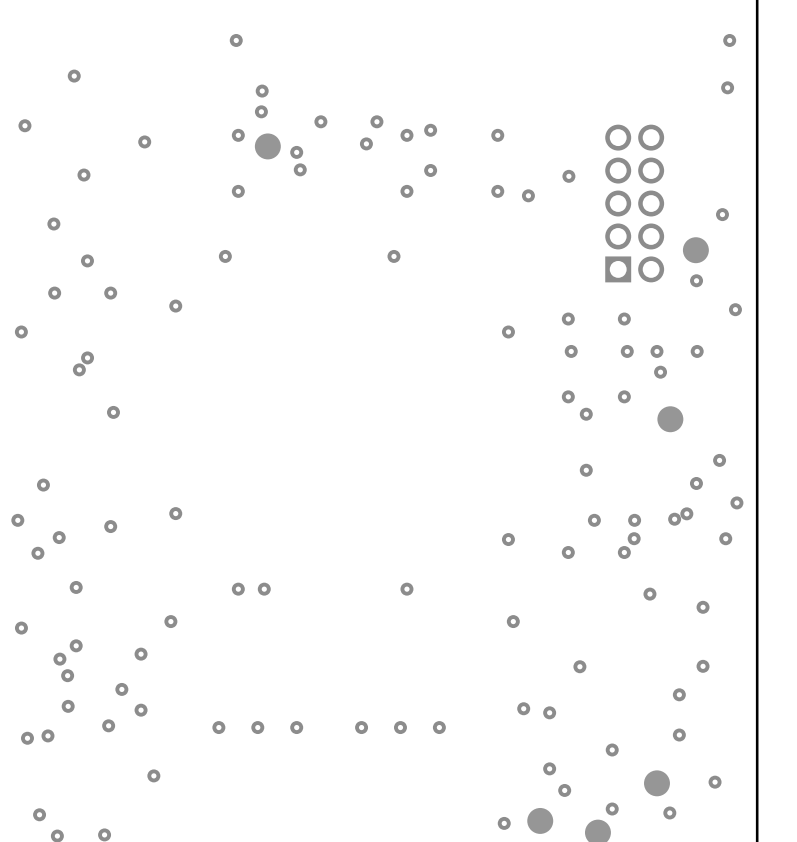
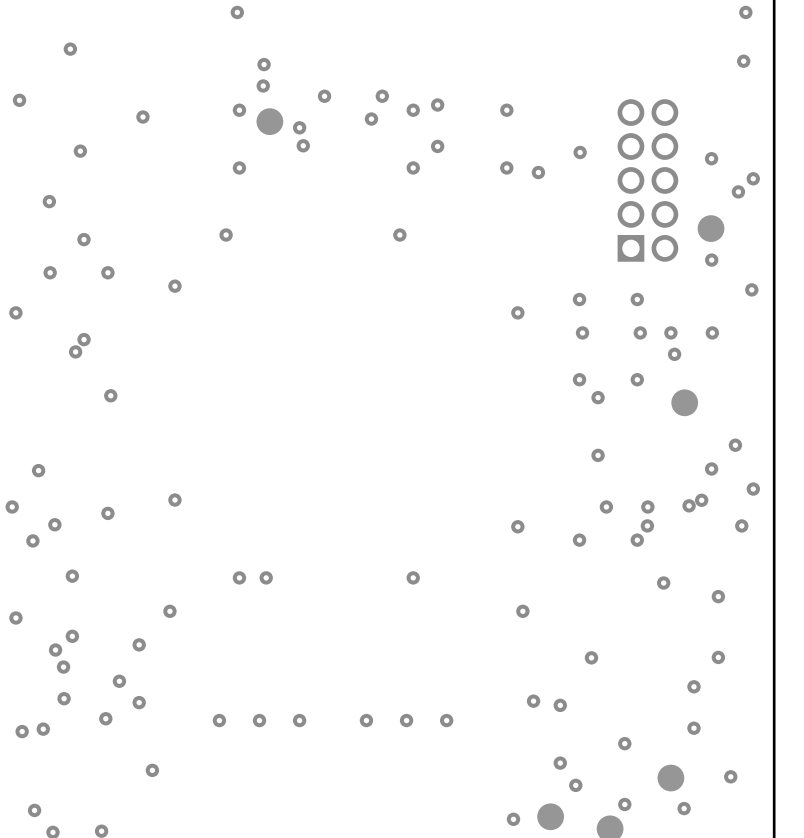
via: none -> (711, 158)
via: none -> (753, 178)

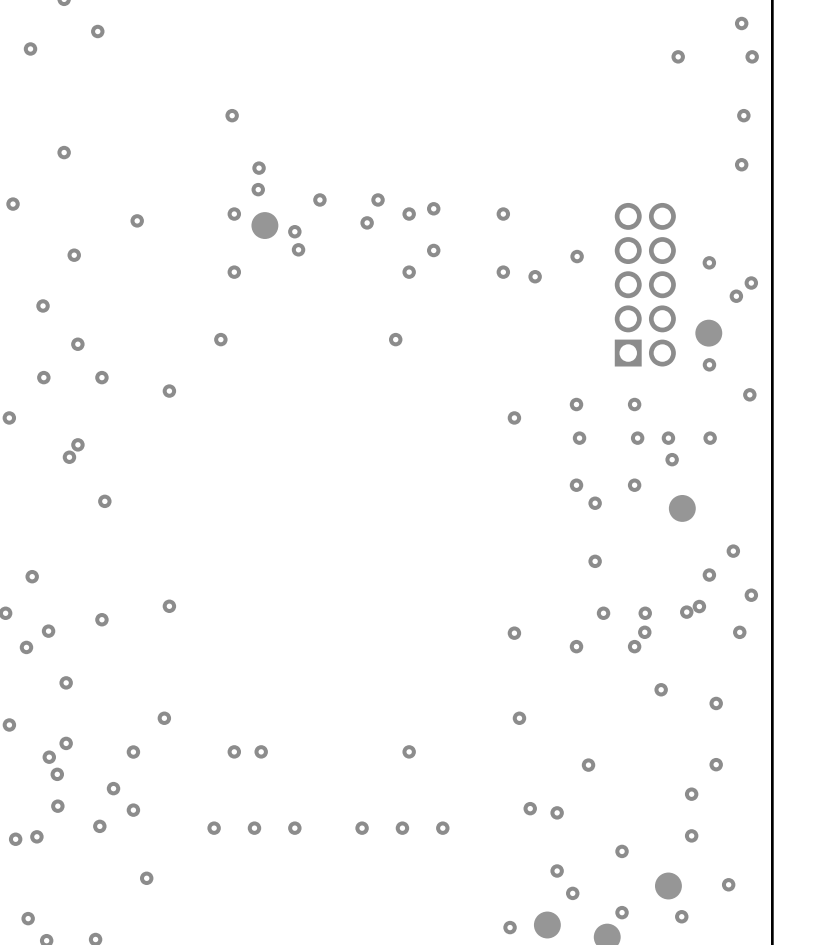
via: (239, 577) -> none
via: (266, 577) -> none
via position: (413, 577) -> (409, 751)
via: none -> (234, 751)
via: none -> (261, 751)

